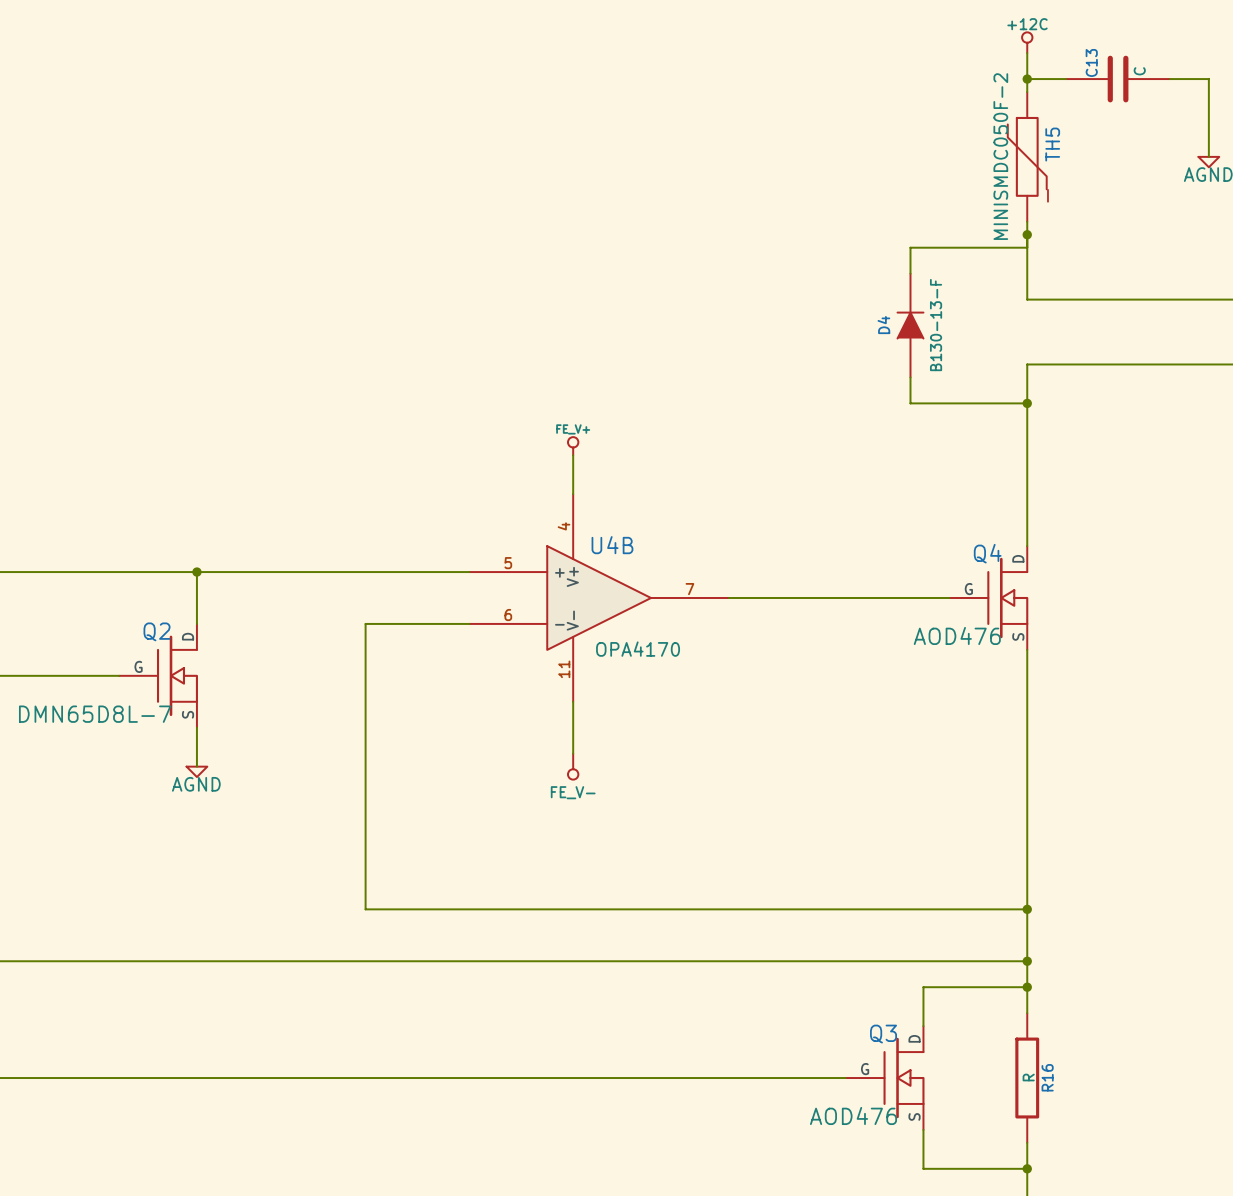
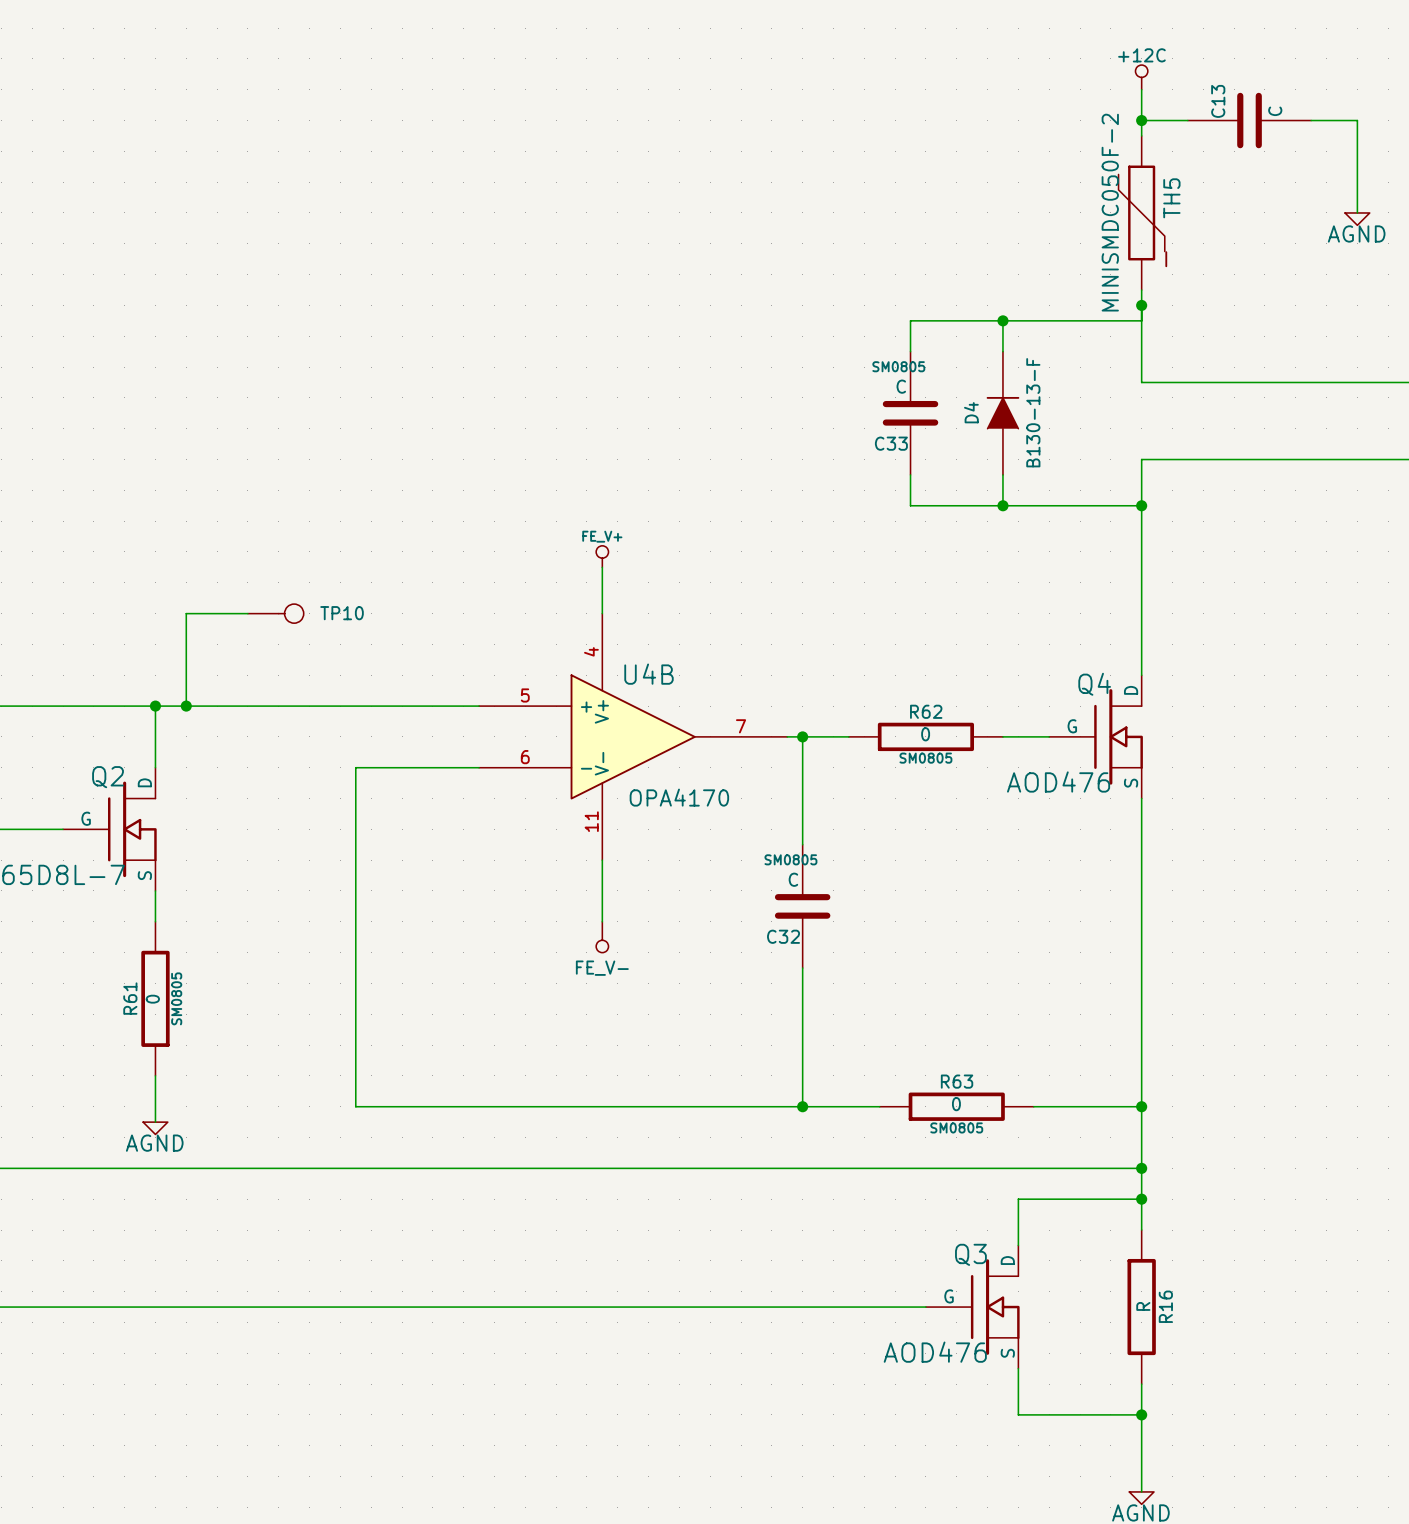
wire: none -> (1002, 320) (910, 320) (910, 351)
junction: none -> (1002, 320)
C33: none -> C (910, 413)
wire: none -> (910, 474) (910, 505) (1002, 505)
junction: none -> (1002, 505)
wire: none -> (247, 613) (186, 613) (186, 706)
TP10: none -> (275, 613)
junction: none -> (186, 706)
wire: none -> (802, 736) (802, 844)
junction: none -> (802, 736)
wire: (780, 597) (910, 597) -> none
R62: none -> 0 (925, 736)
C32: none -> C (802, 906)
power symbol position: AGND (196, 771) -> AGND (155, 1128)
wire: none -> (802, 968) (802, 1106)
R61: none -> 0 (155, 998)
wire: none -> (155, 1075) (155, 1122)
junction: none -> (802, 1106)
wire: (806, 909) (936, 909) -> none
R63: none -> 0 (956, 1106)

